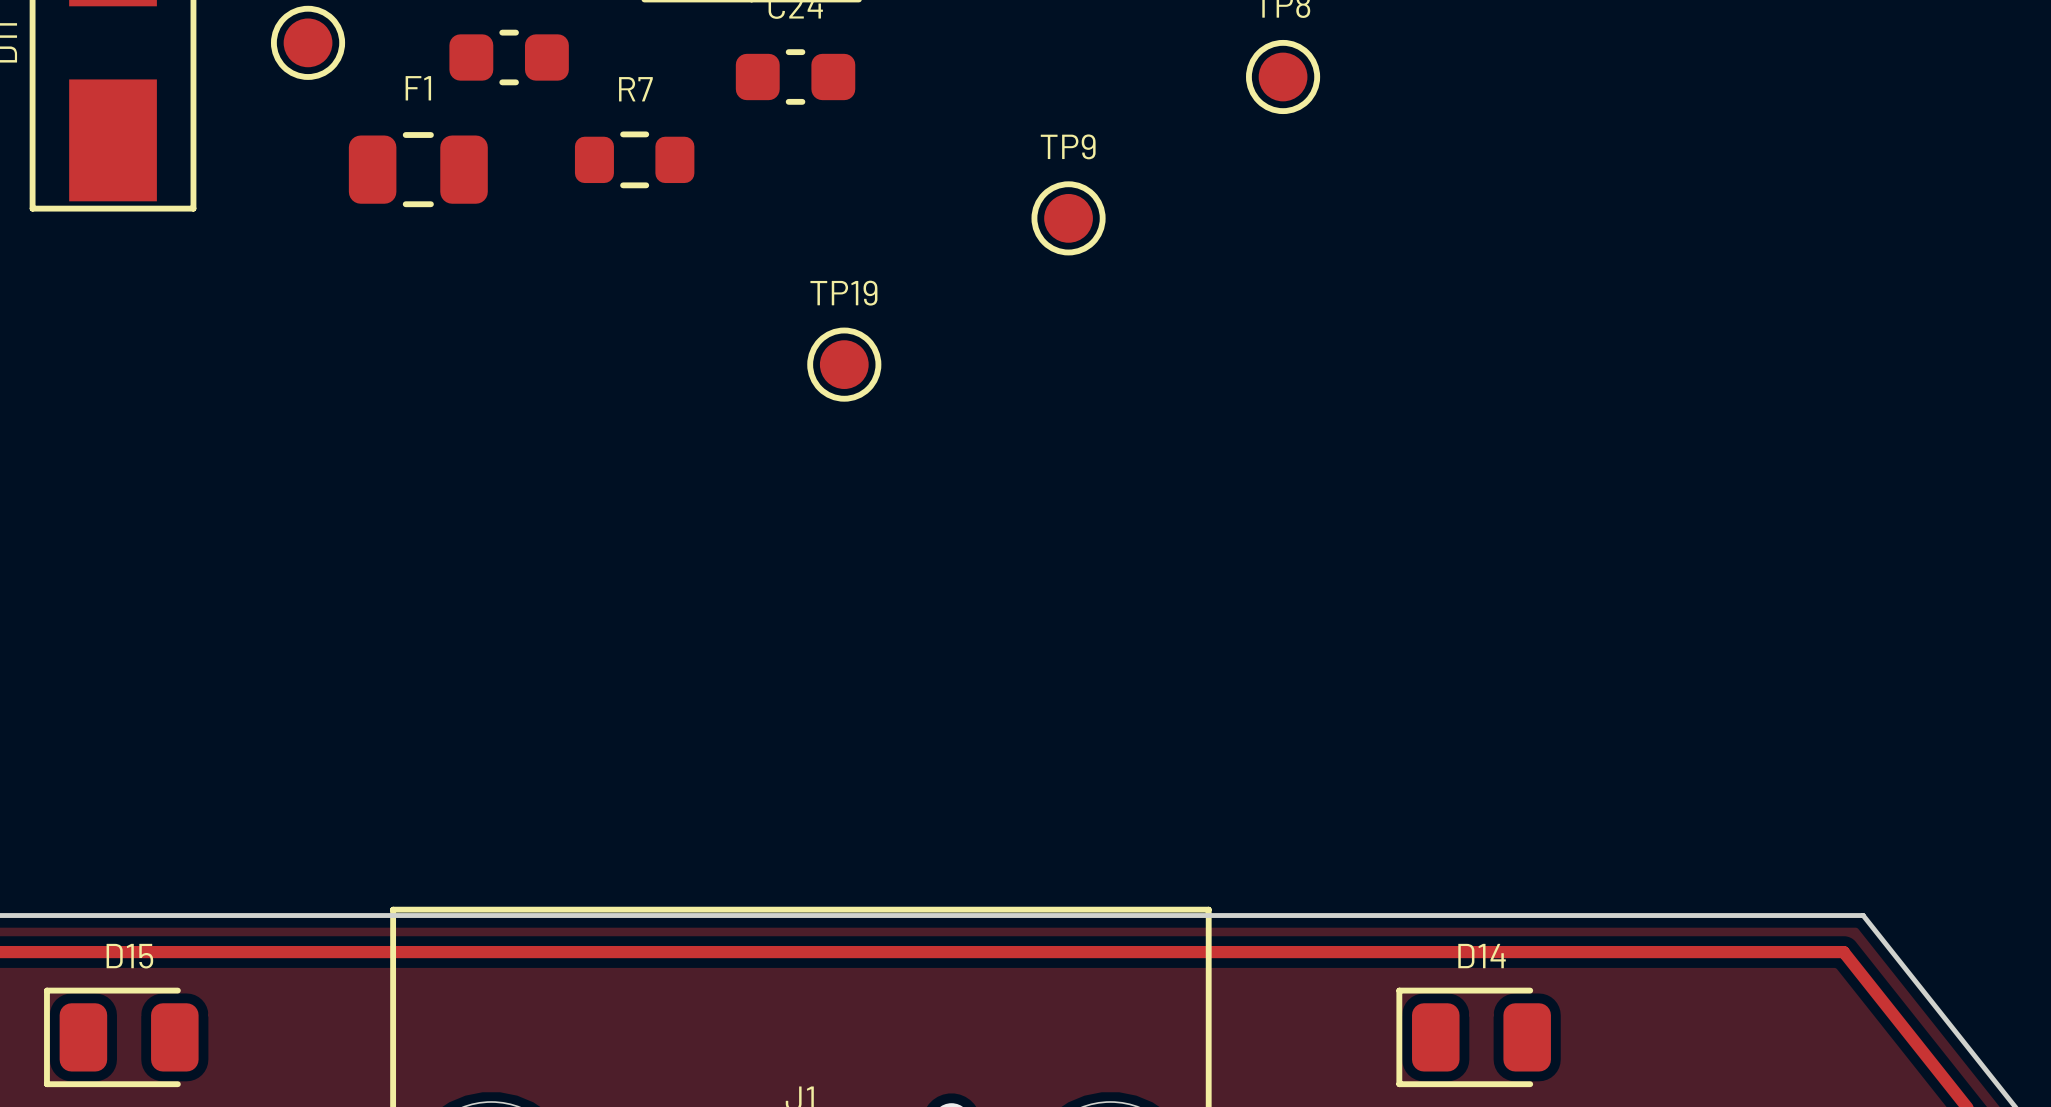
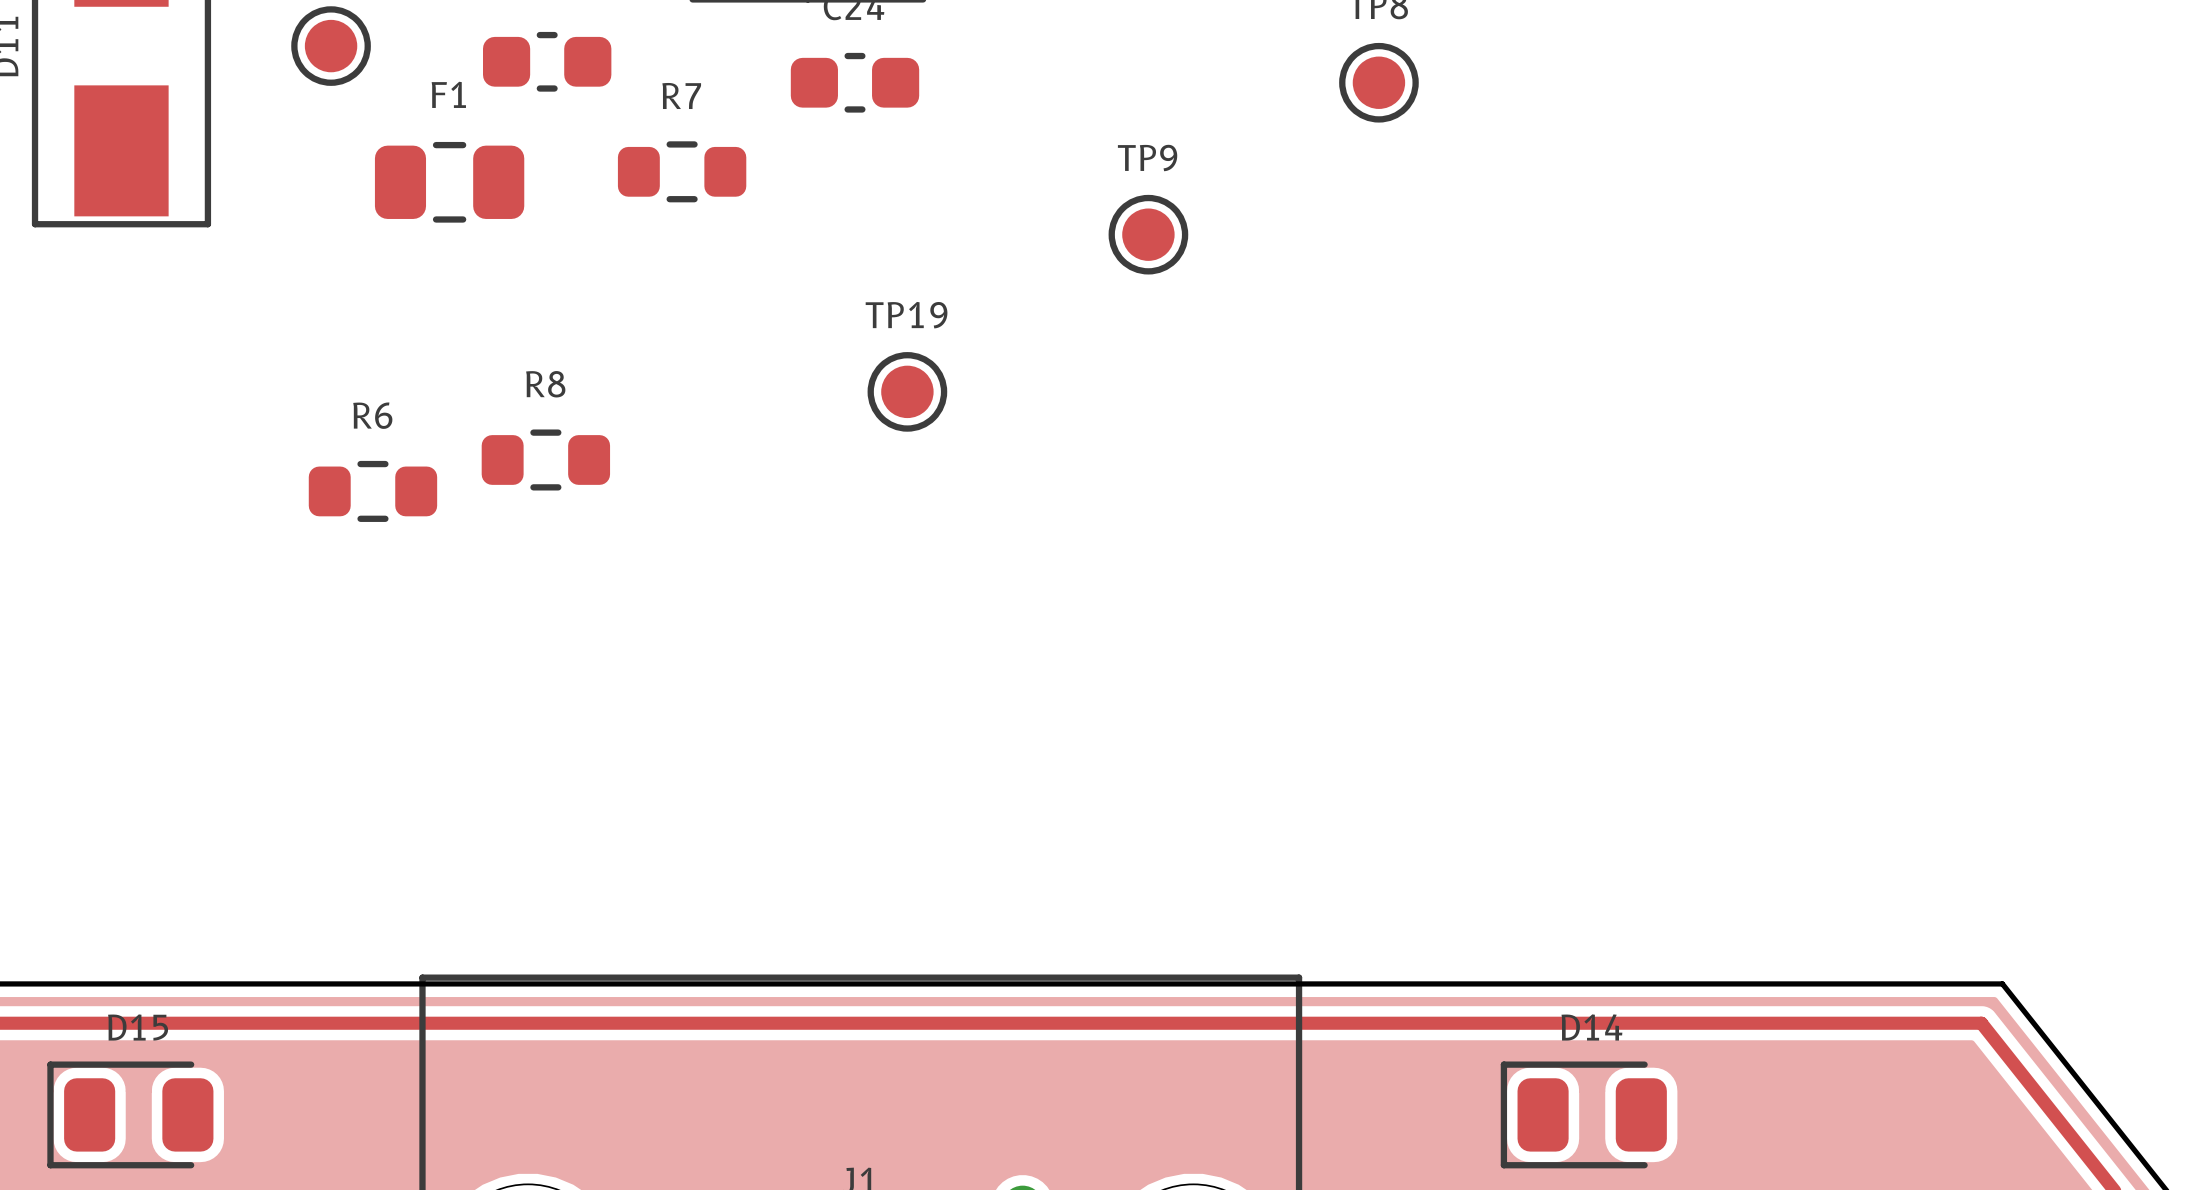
R8: none -> (545, 459)
R6: none -> (372, 491)

